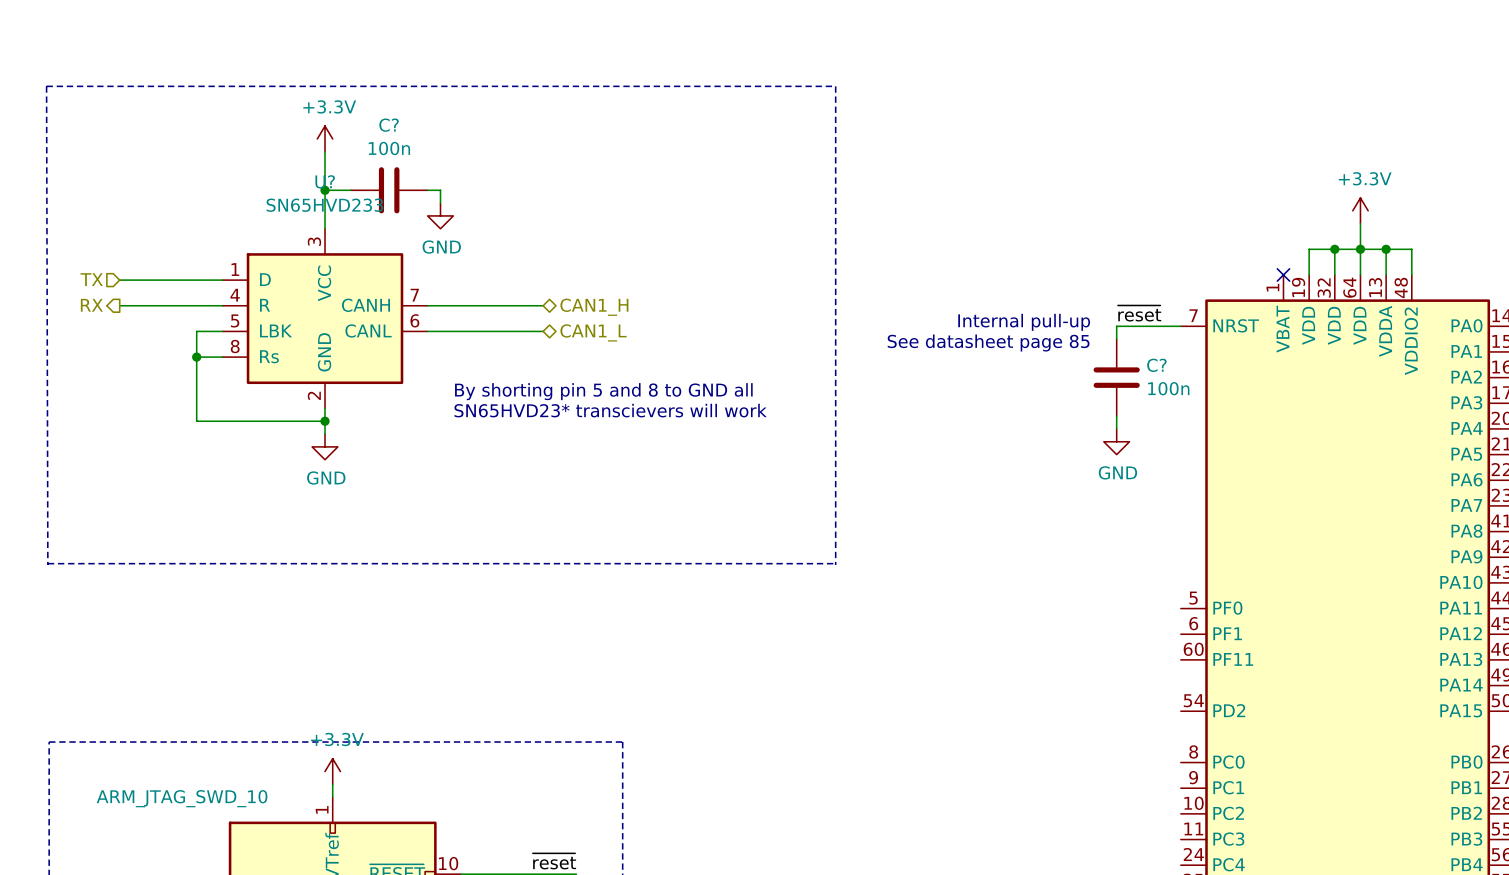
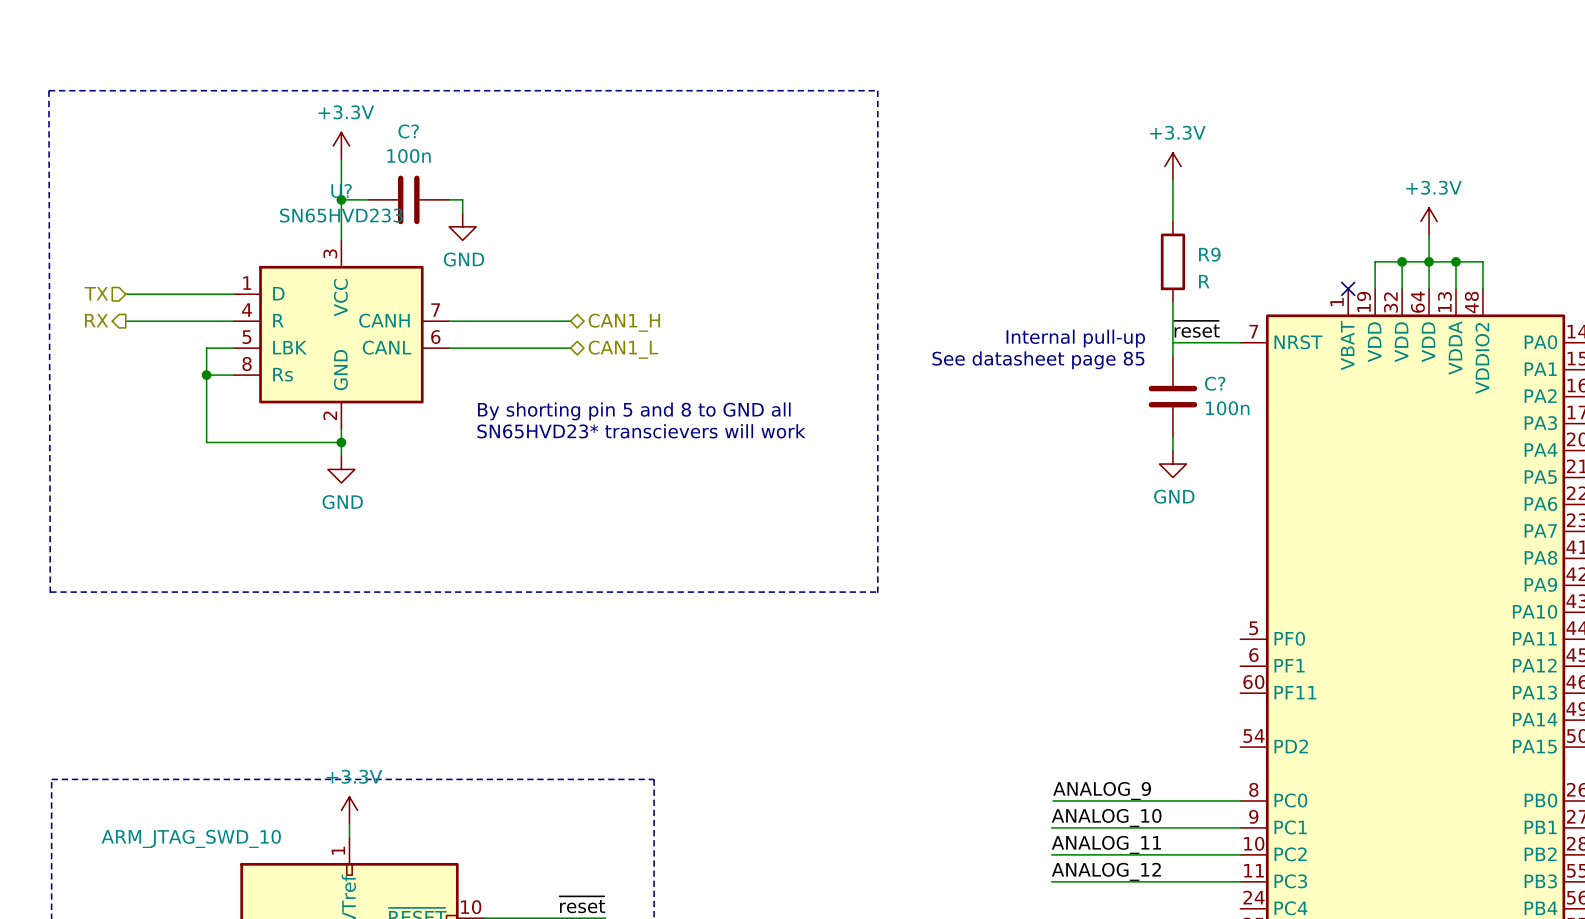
power symbol: none -> +3.3V (1172, 166)
wire: none -> (1172, 179) (1172, 221)
R9: none -> R (1172, 261)
wire: none -> (1172, 302) (1172, 341)
label: none -> ANALOG_9 (1102, 791)
wire: none -> (1053, 800) (1240, 800)
label: none -> ANALOG_10 (1106, 817)
wire: none -> (1051, 827) (1240, 827)
label: none -> ANALOG_11 (1106, 844)
wire: none -> (1051, 854) (1240, 854)
label: none -> ANALOG_12 (1106, 871)
wire: none -> (1051, 881) (1240, 881)

